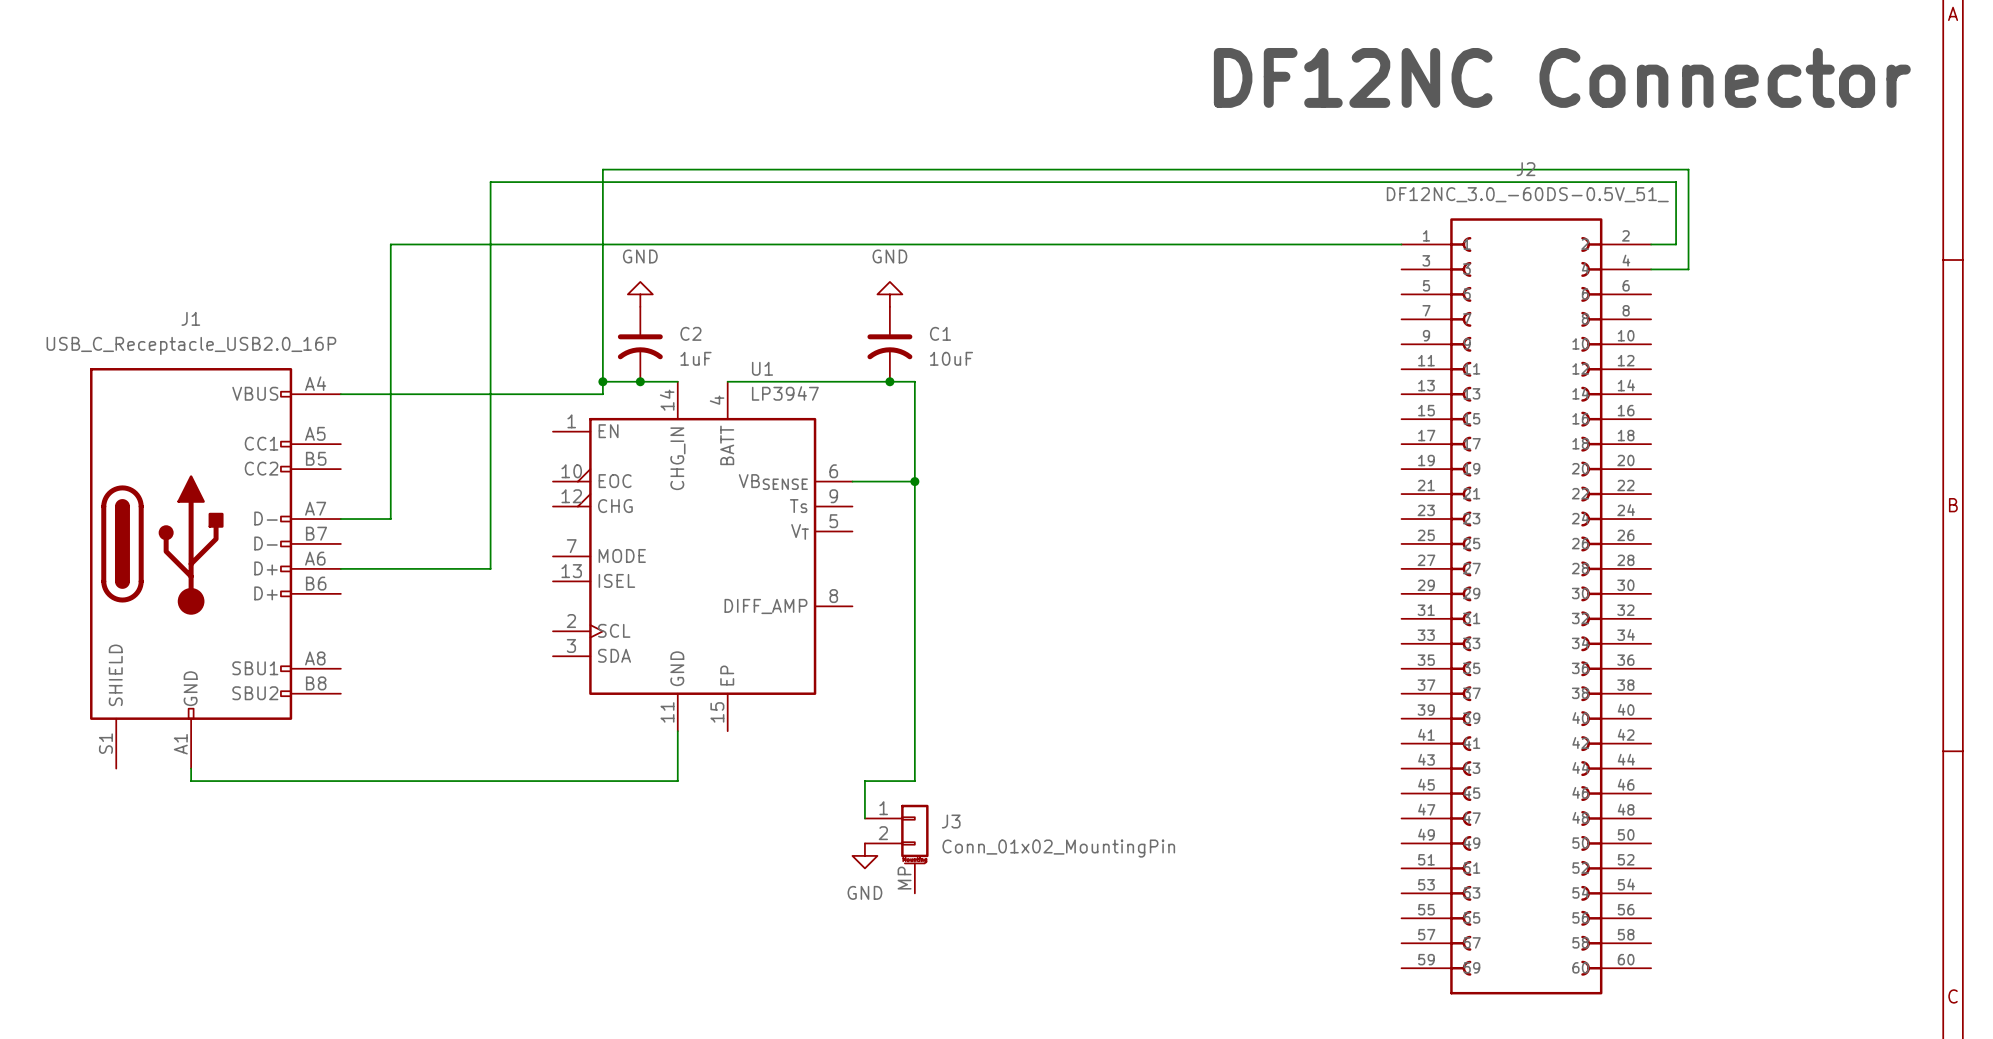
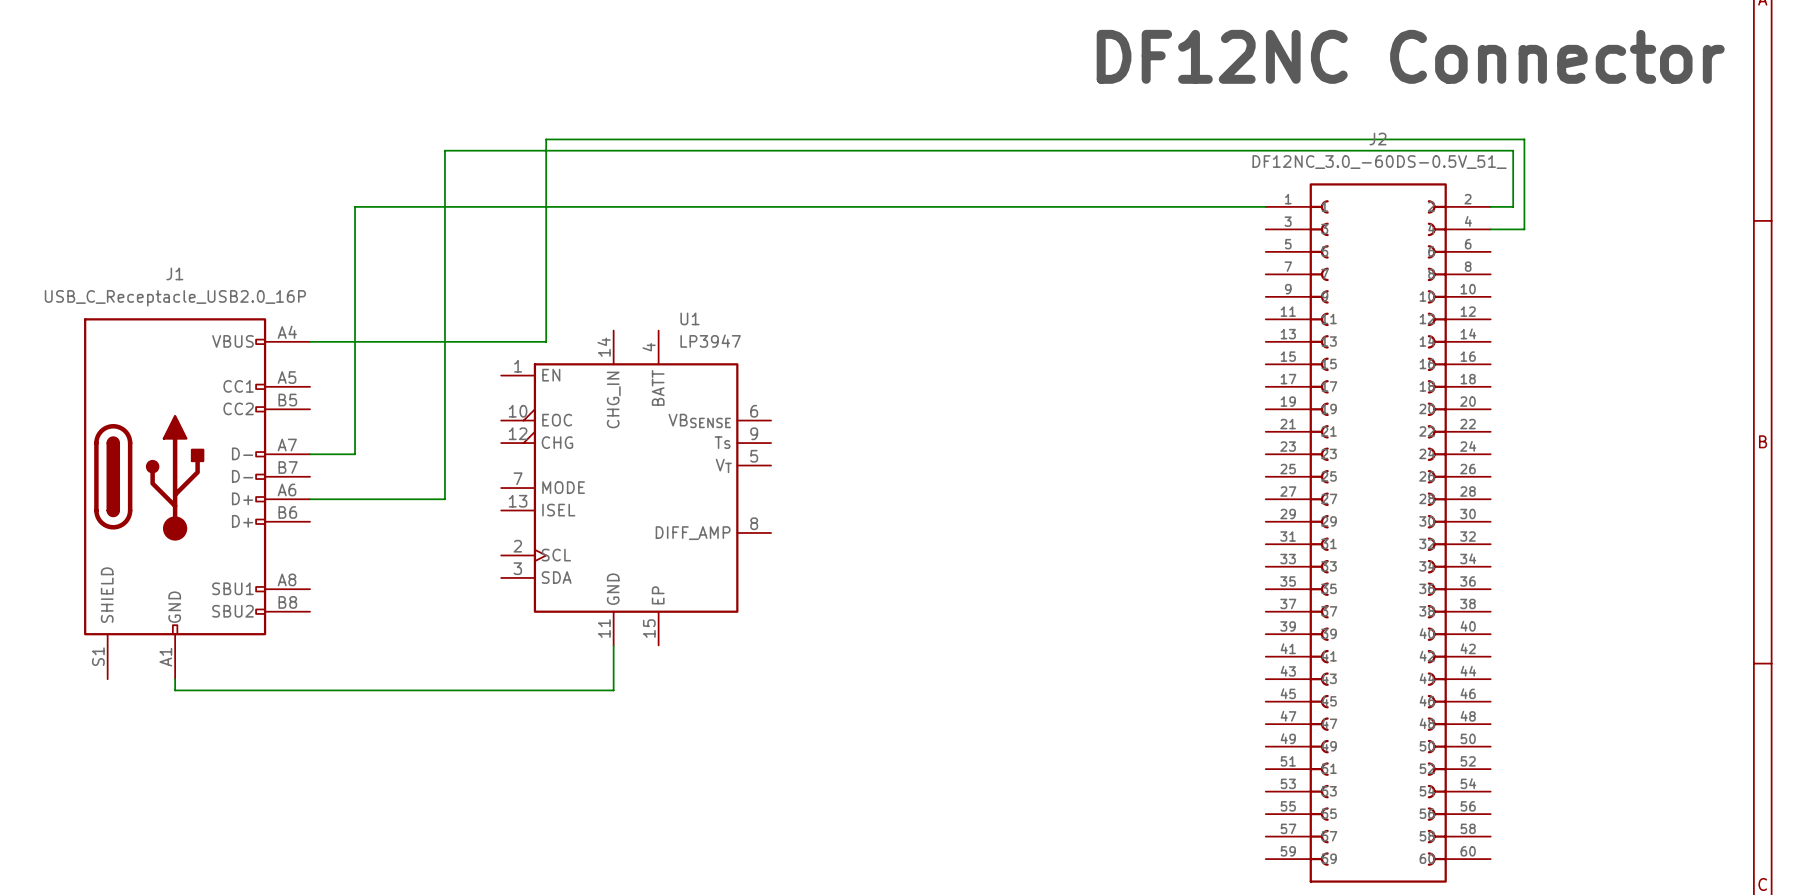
power symbol: GND (640, 294) -> none
power symbol: GND (889, 294) -> none
C2: 1uF (640, 344) -> none
C1: 10uF (889, 344) -> none
wire: (602, 381) (677, 381) -> none
junction: (602, 381) -> none
junction: (640, 381) -> none
wire: (727, 381) (914, 381) (914, 781) (864, 781) (864, 818) -> none
junction: (889, 381) -> none
wire: (852, 481) (914, 481) -> none
junction: (914, 481) -> none
J3: Conn_01x02_MountingPin (896, 849) -> none
power symbol: GND (864, 855) -> none

